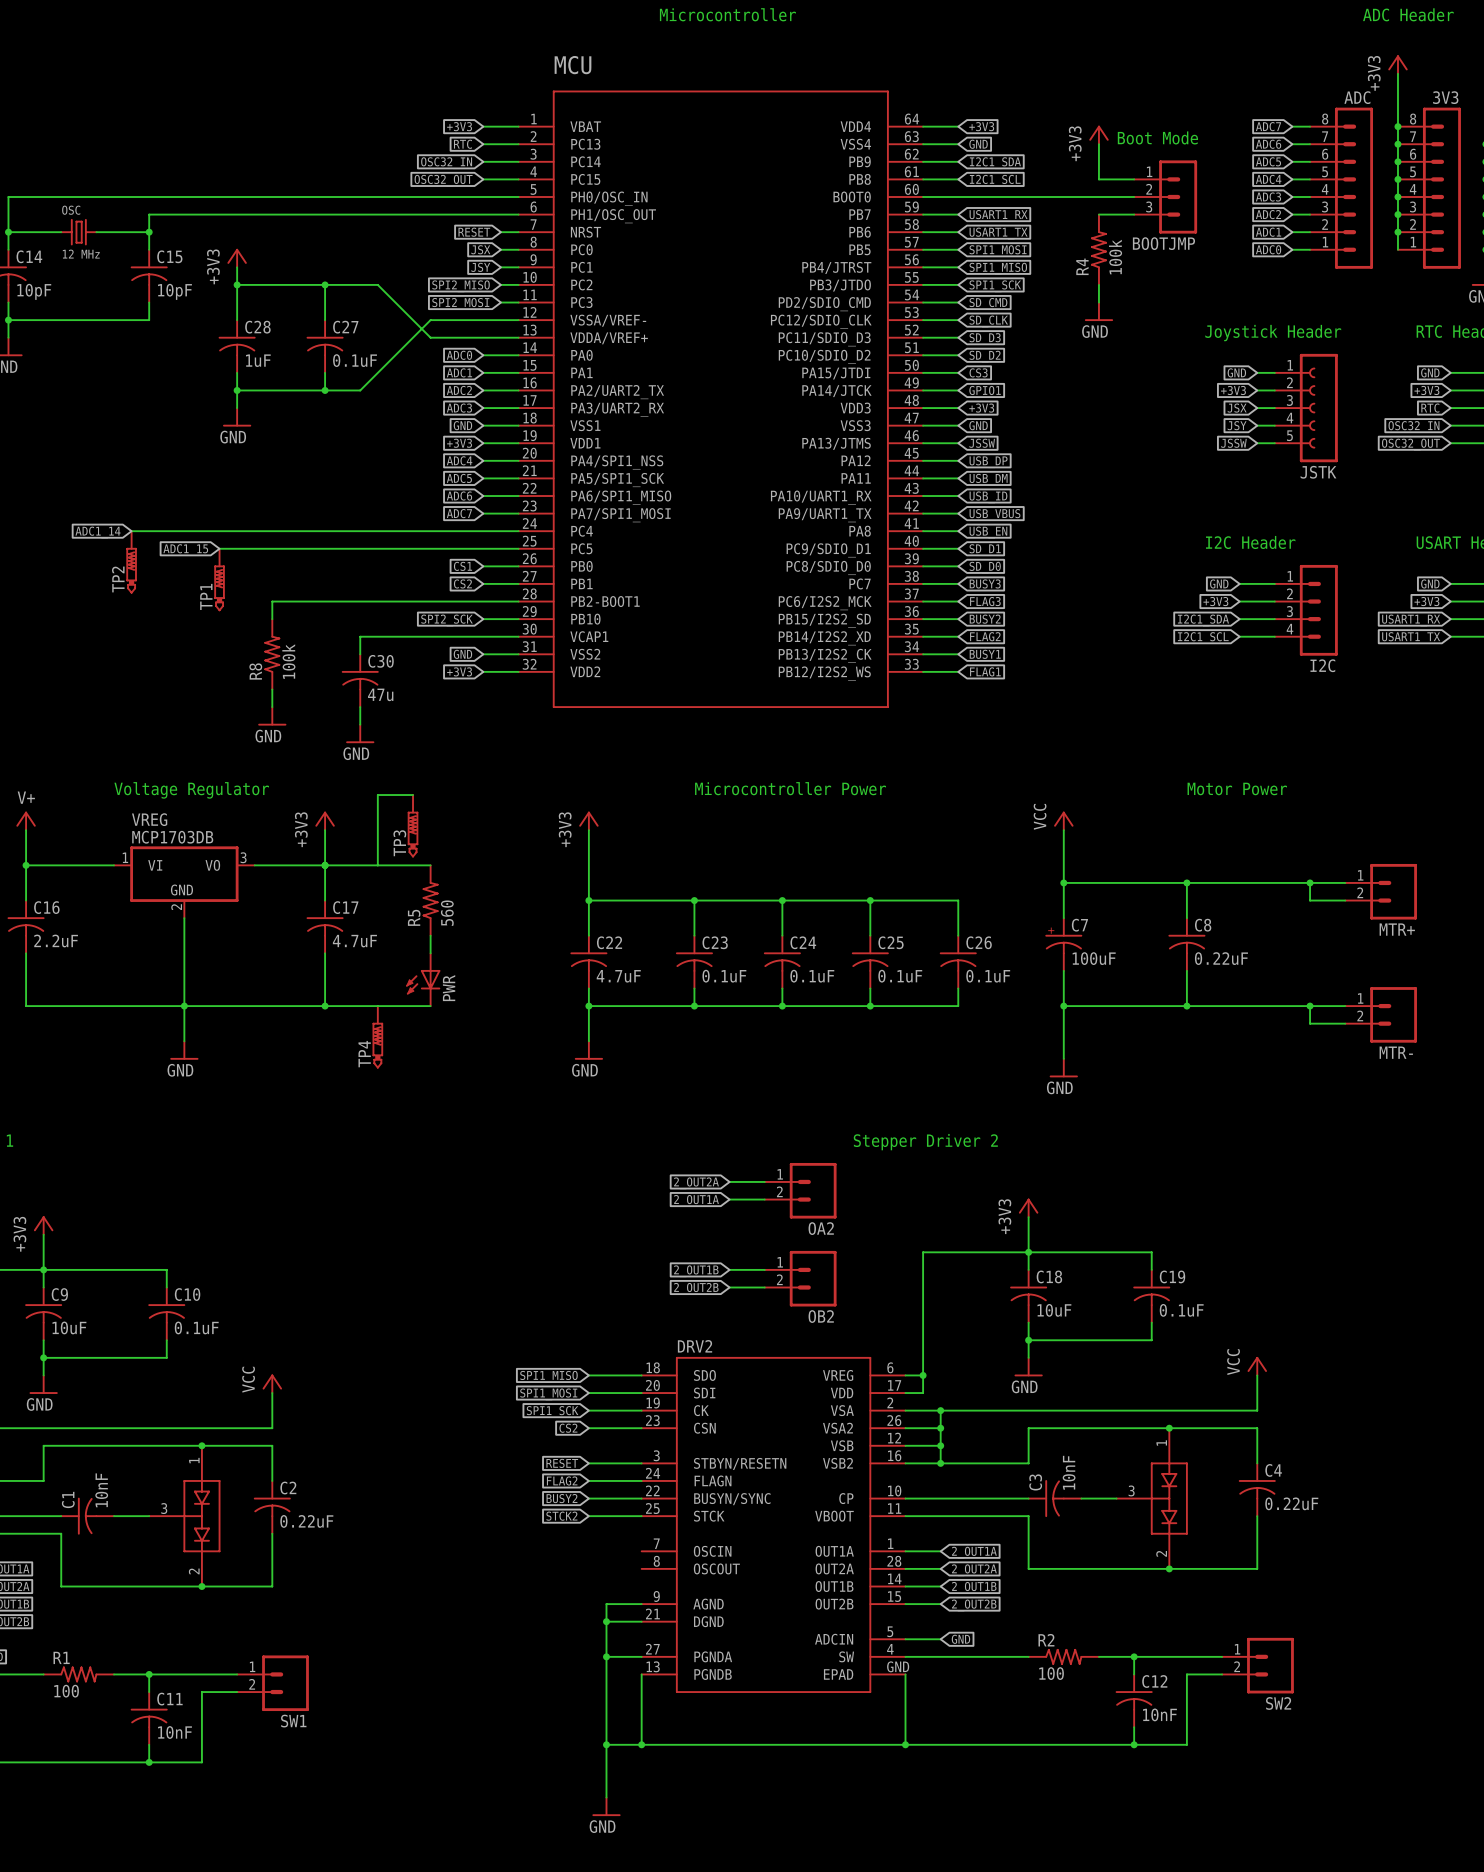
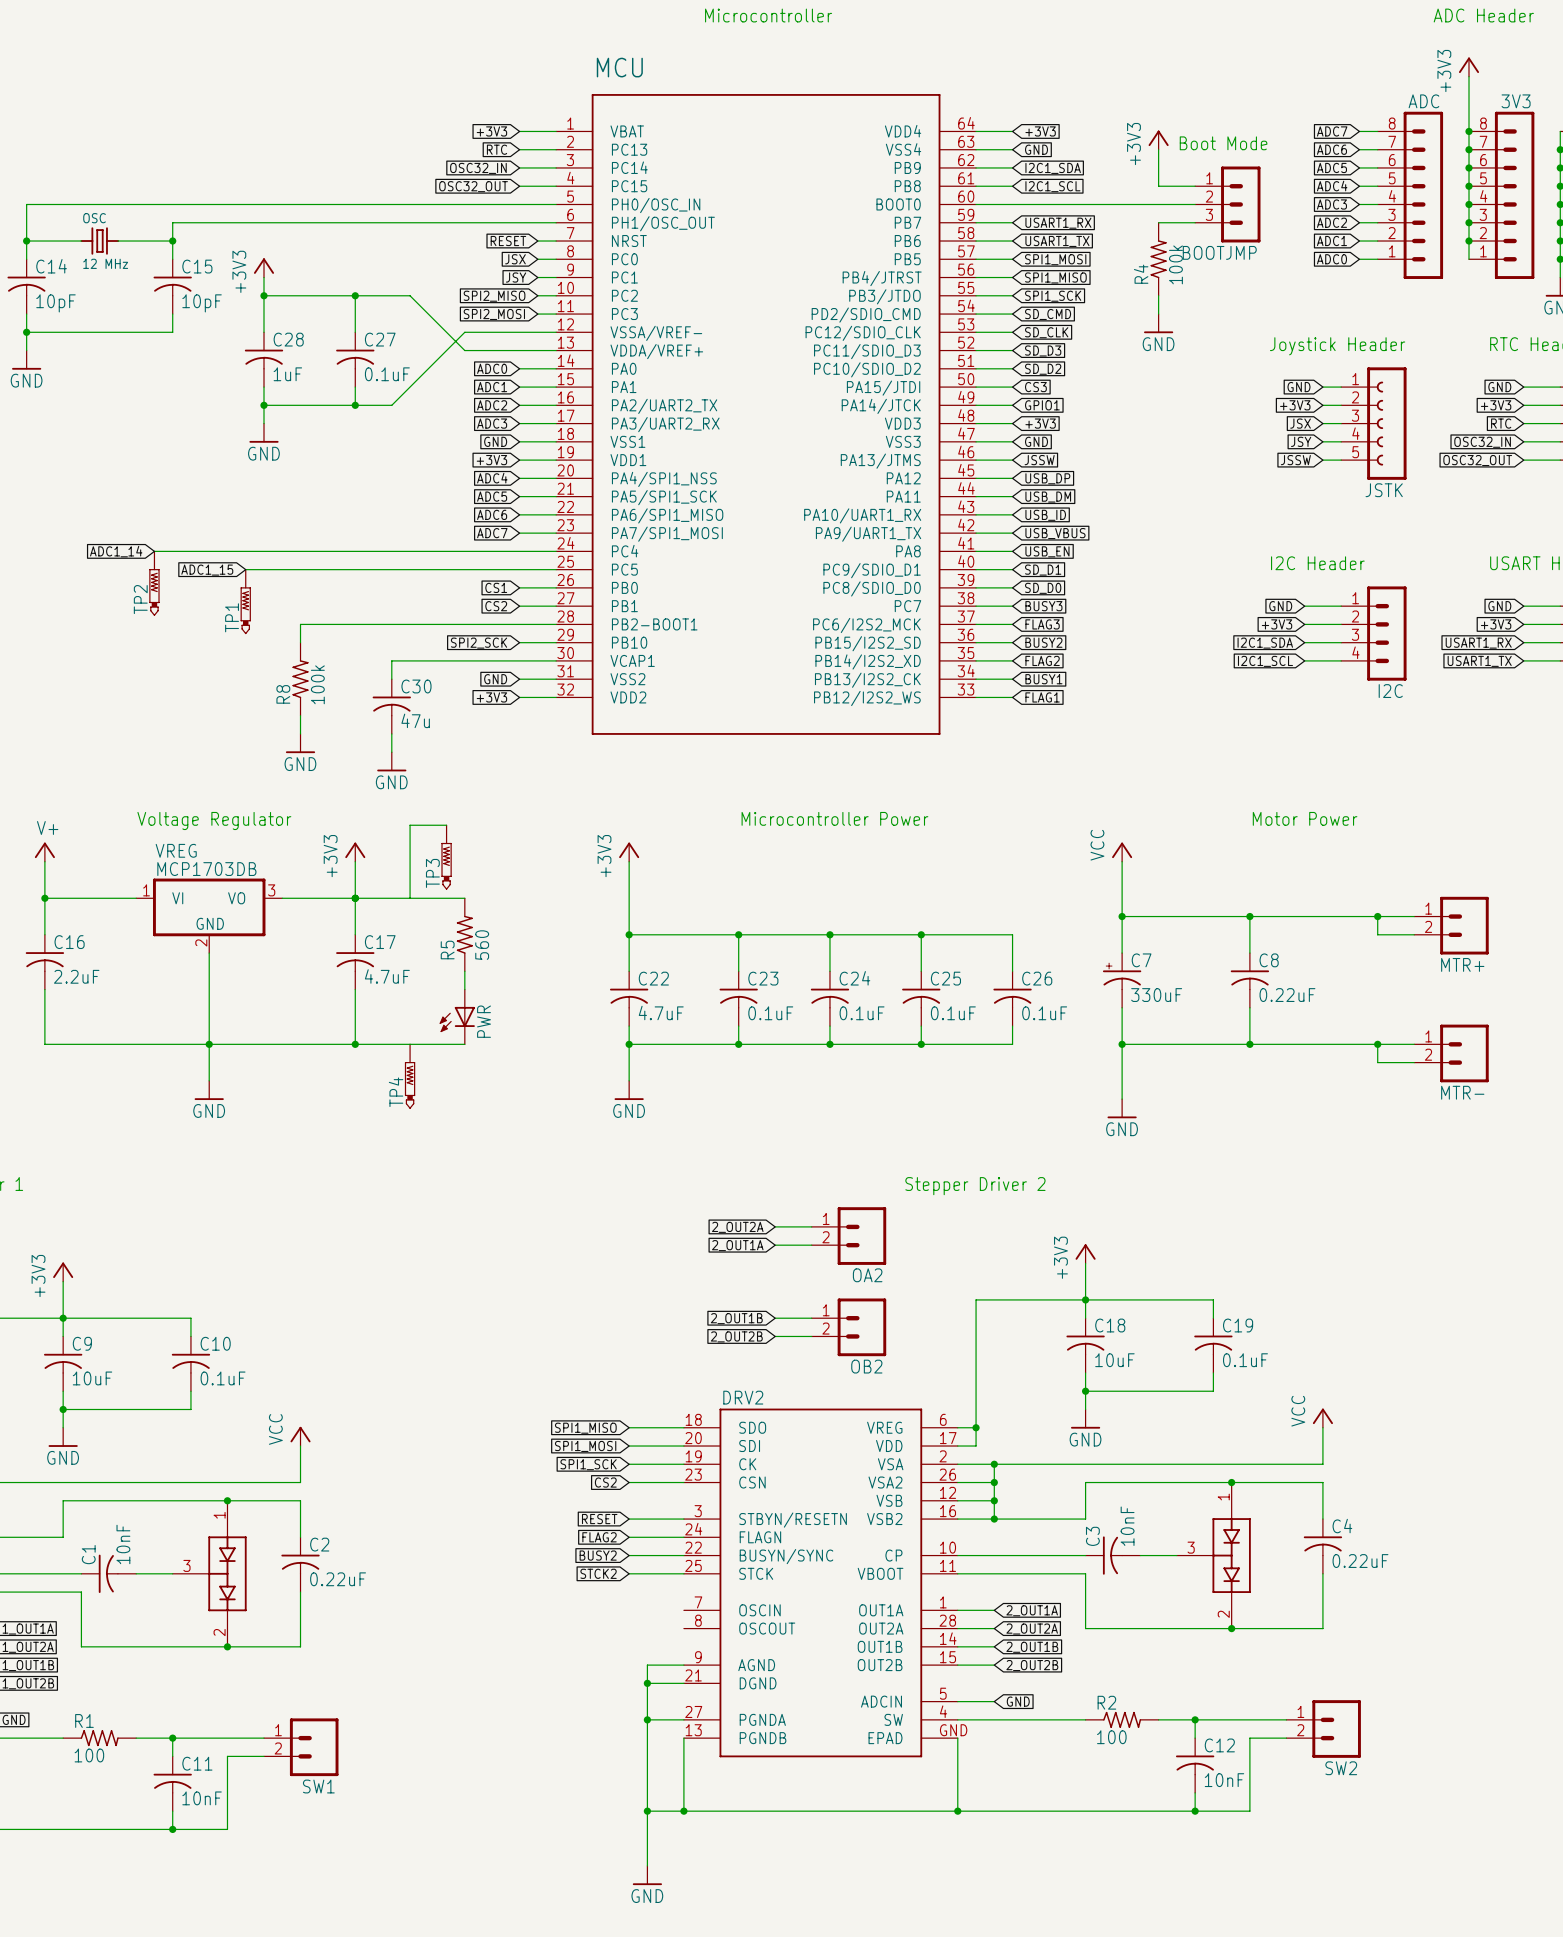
C7 value: 100uF (1094, 958) -> 330uF (1156, 995)

